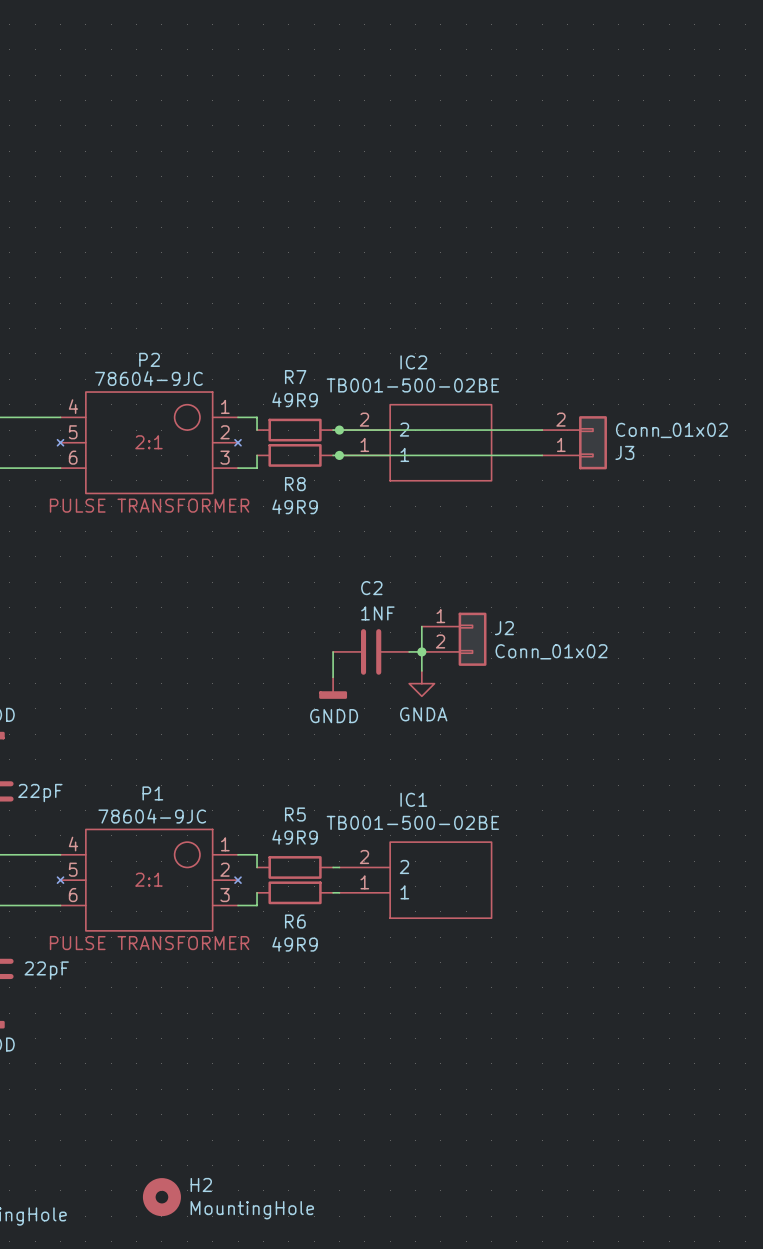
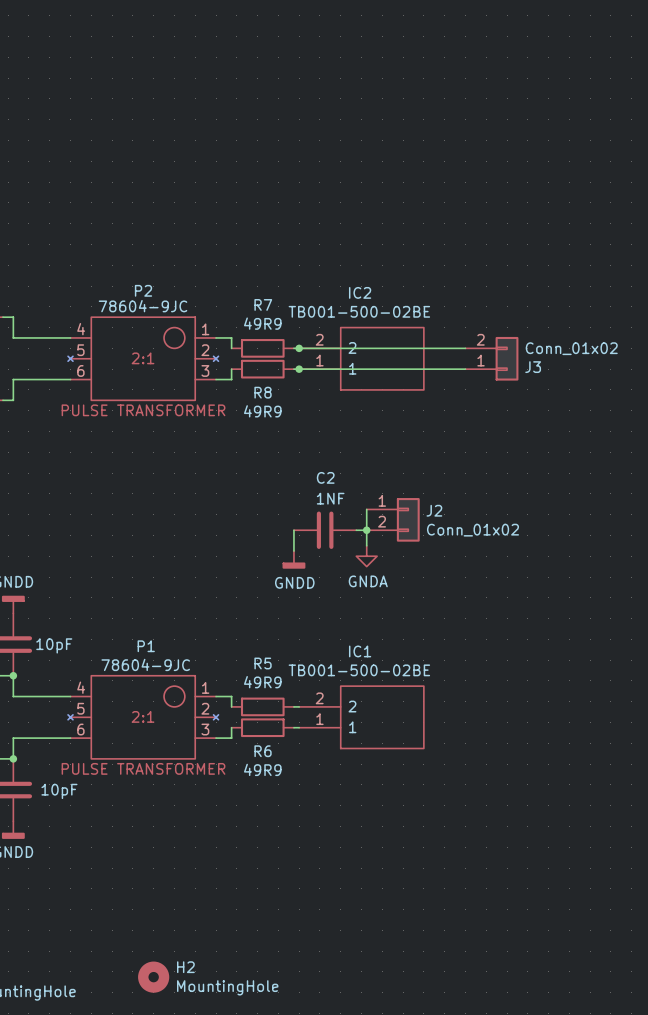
part value: 22pF (40, 793) -> 10pF (54, 645)
part value: 22pF (46, 970) -> 10pF (59, 791)

